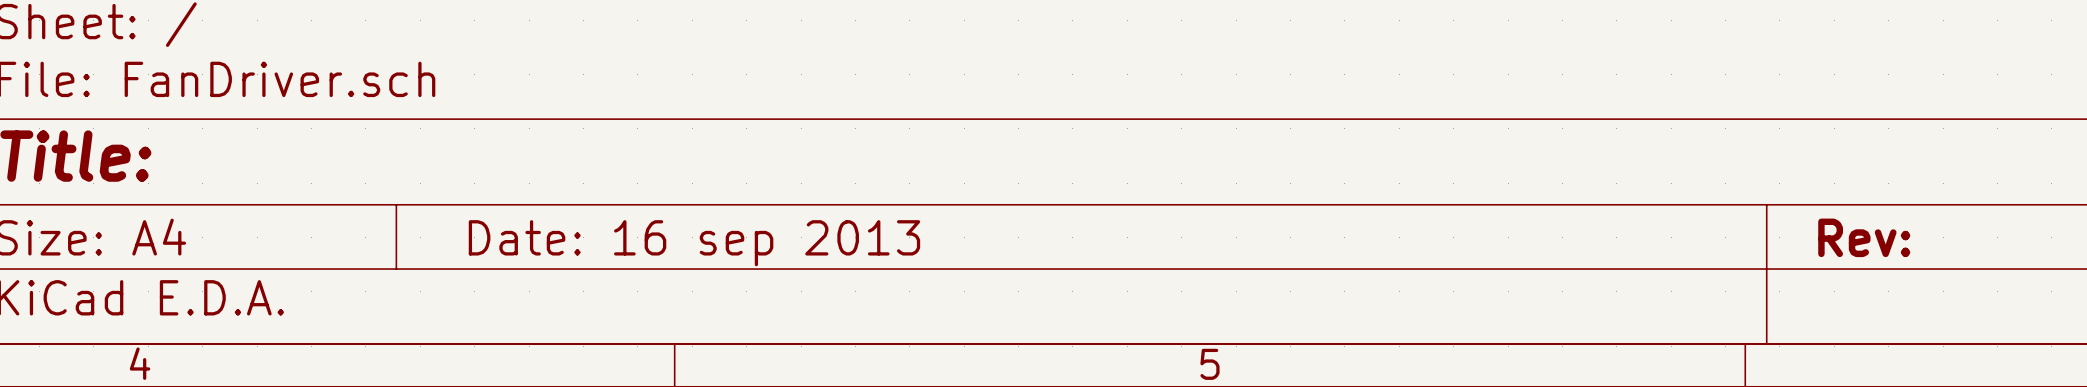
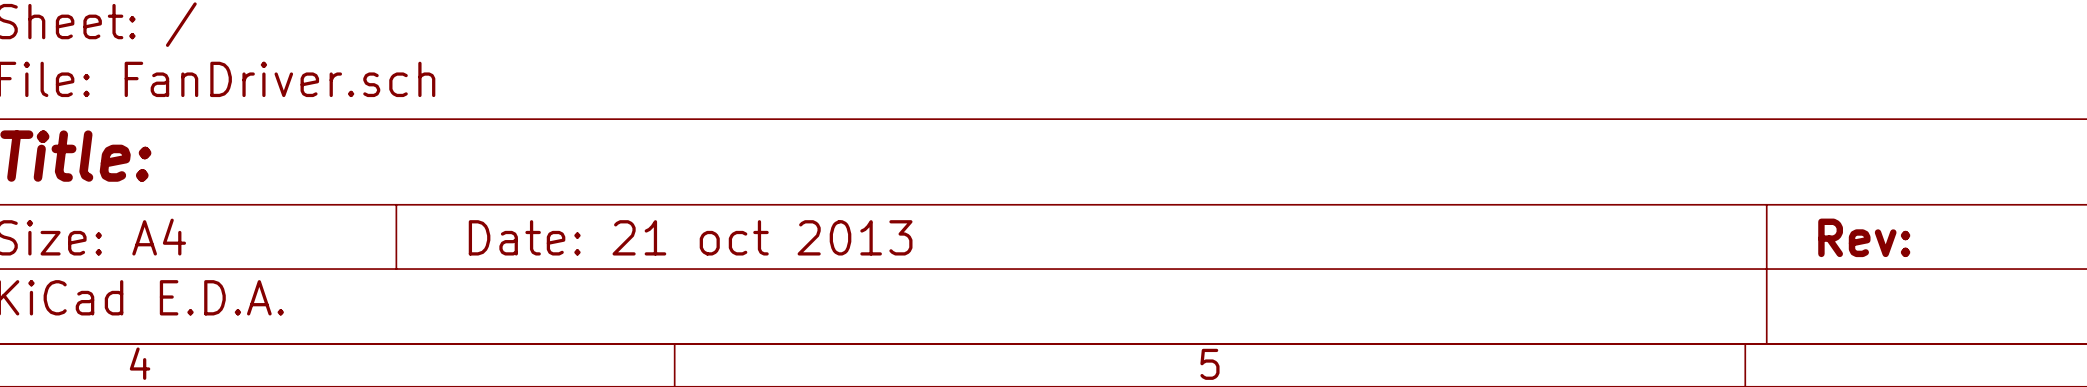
title block: Date: 16 sep 2013 (694, 243) -> Date: 21 oct 2013 (690, 237)

